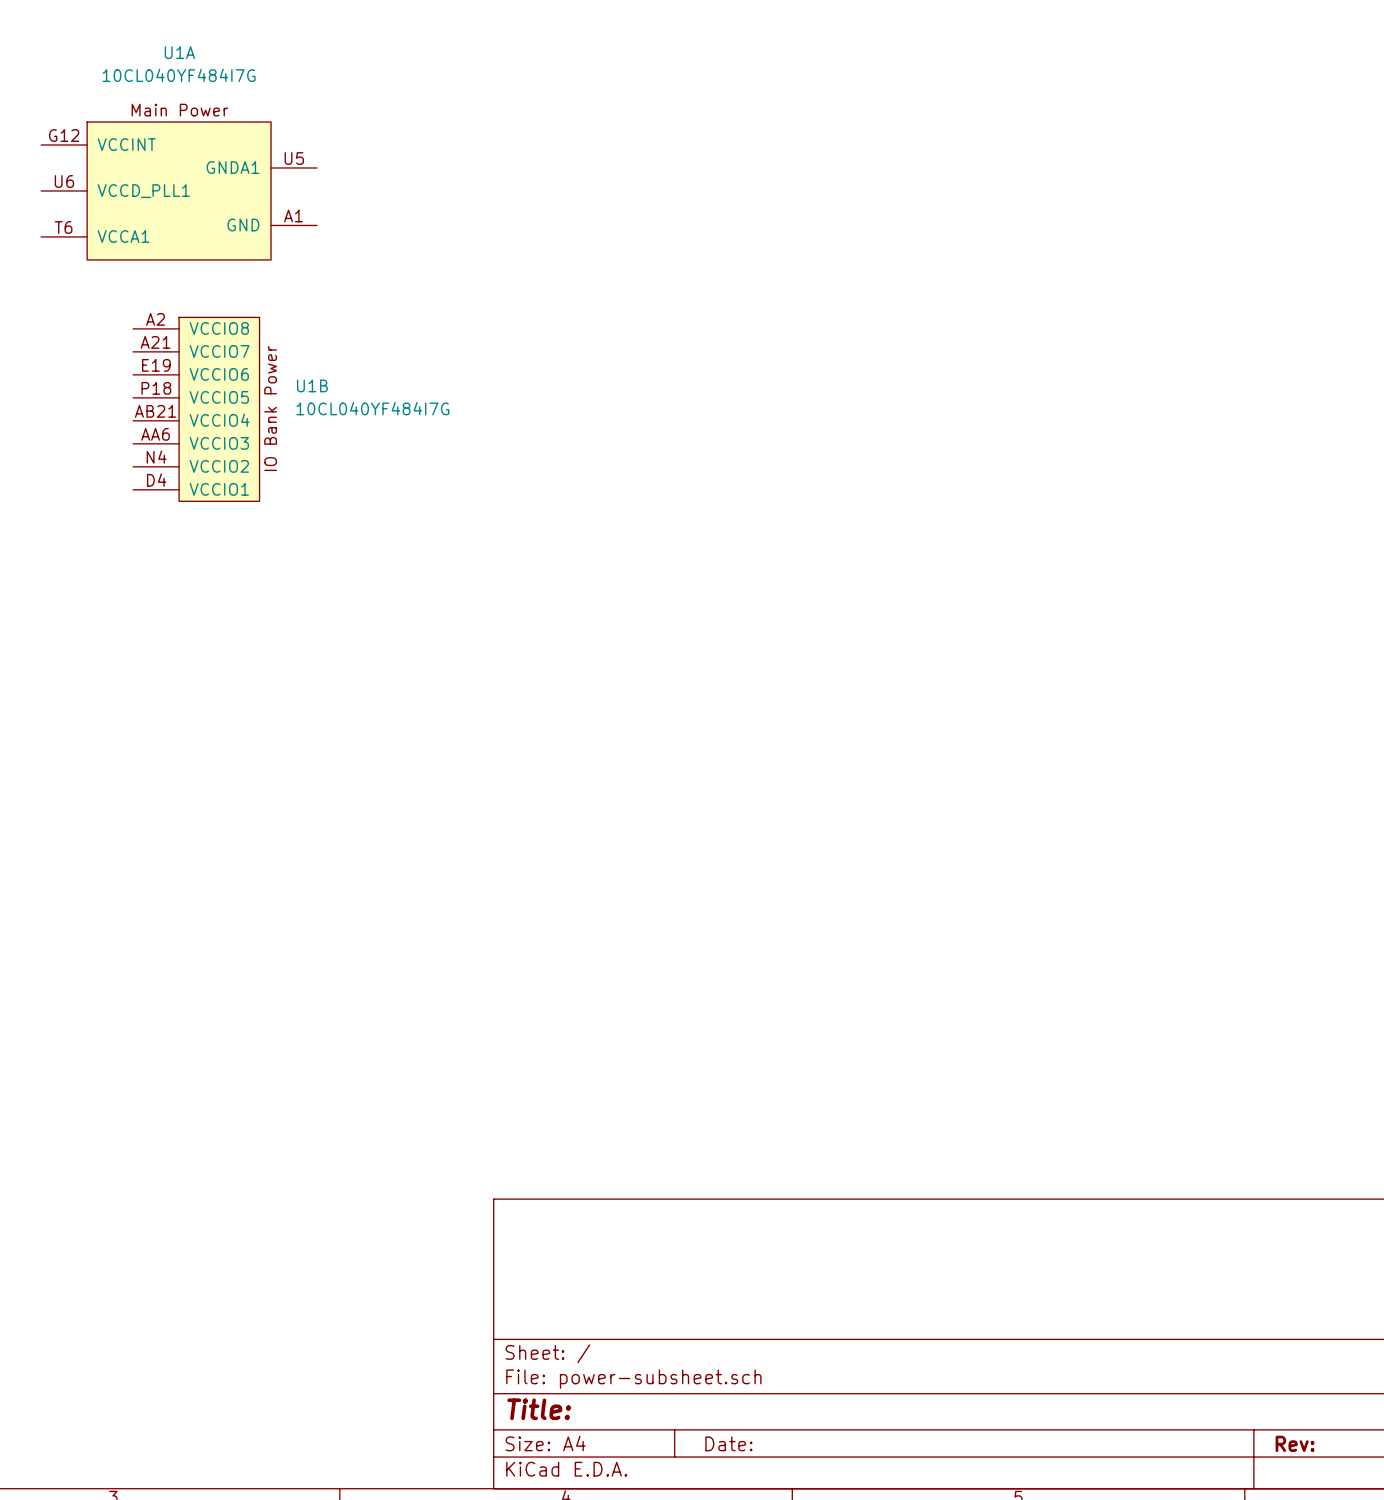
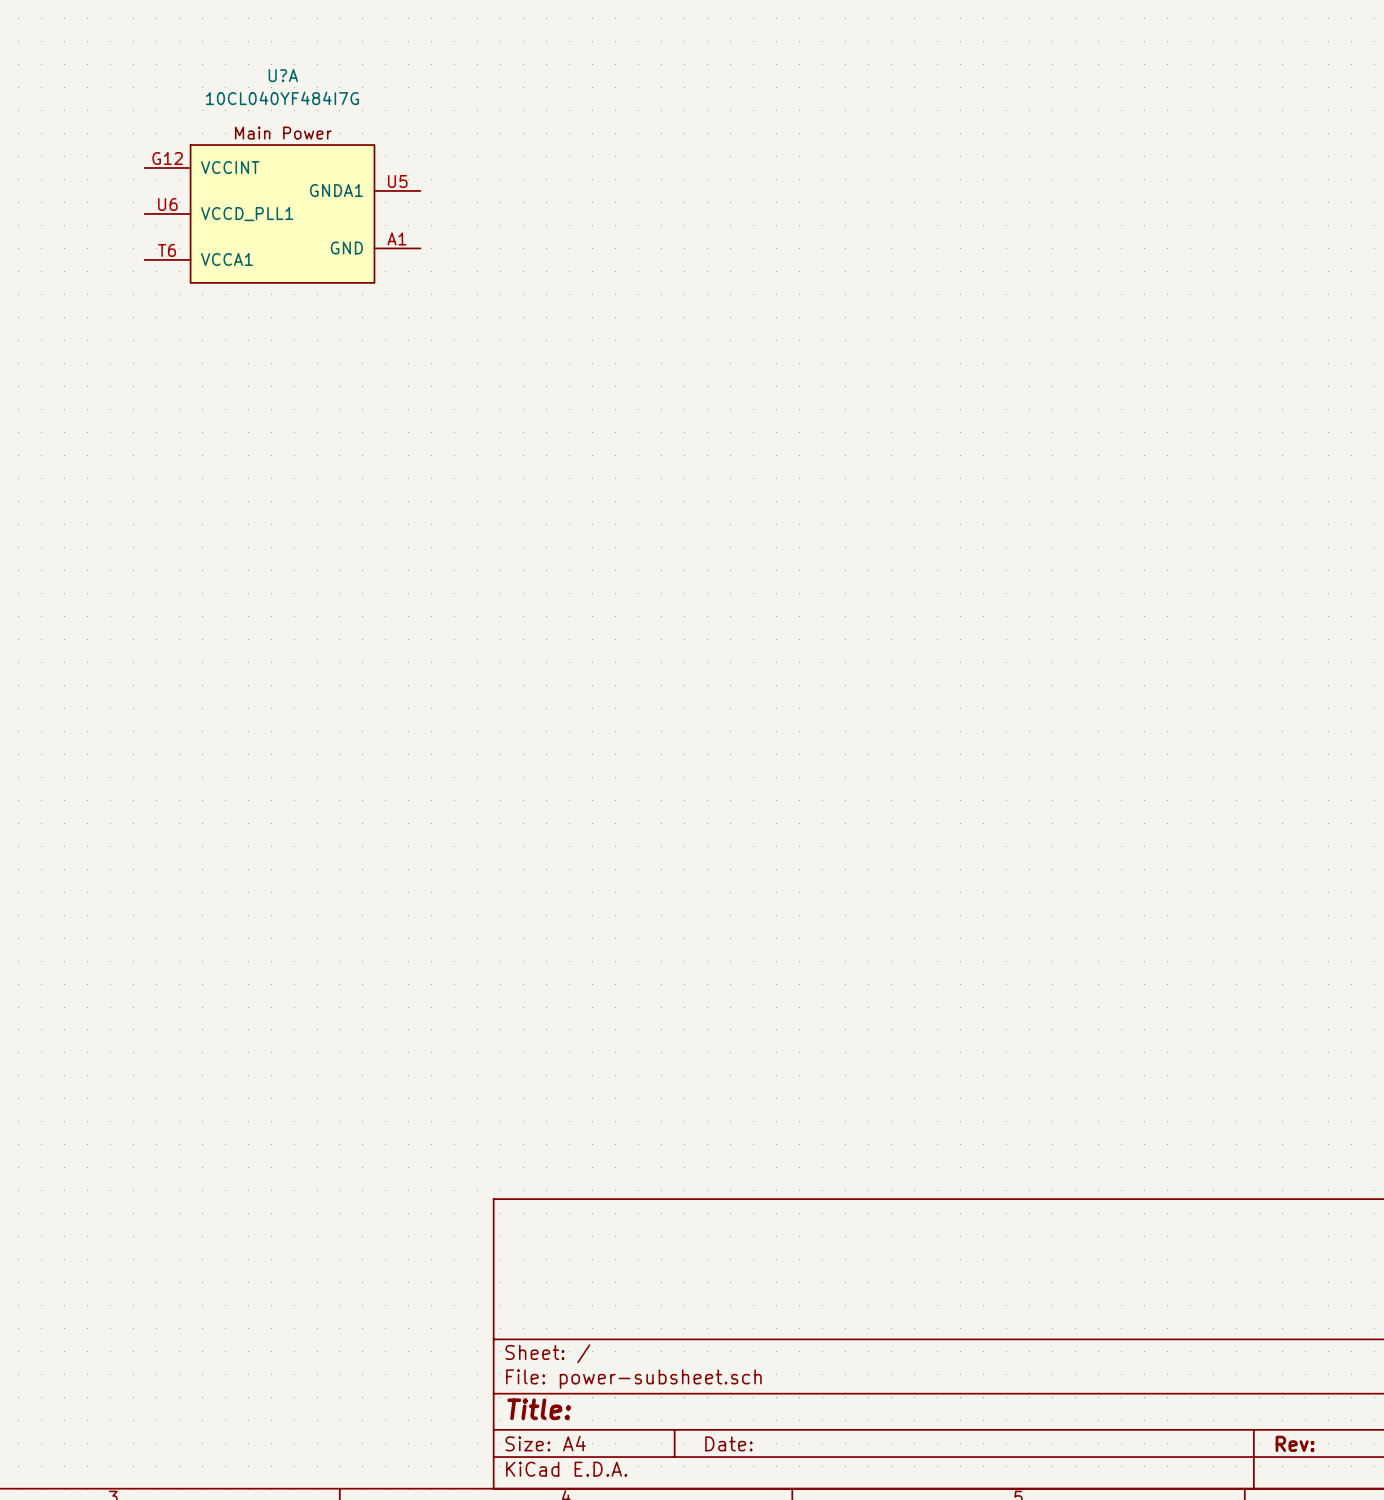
U1A: 10CL040YF484I7G (179, 190) -> none
U?A: none -> 10CL040YF484I7G (282, 213)
U1B: 10CL040YF484I7G (196, 409) -> none

